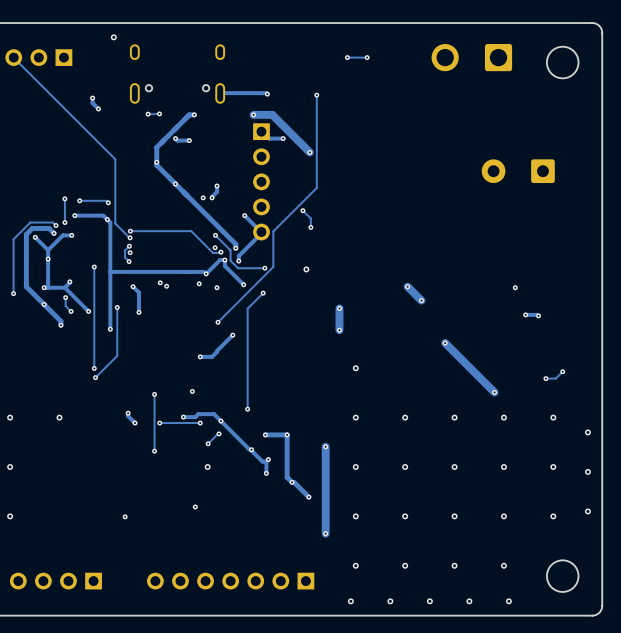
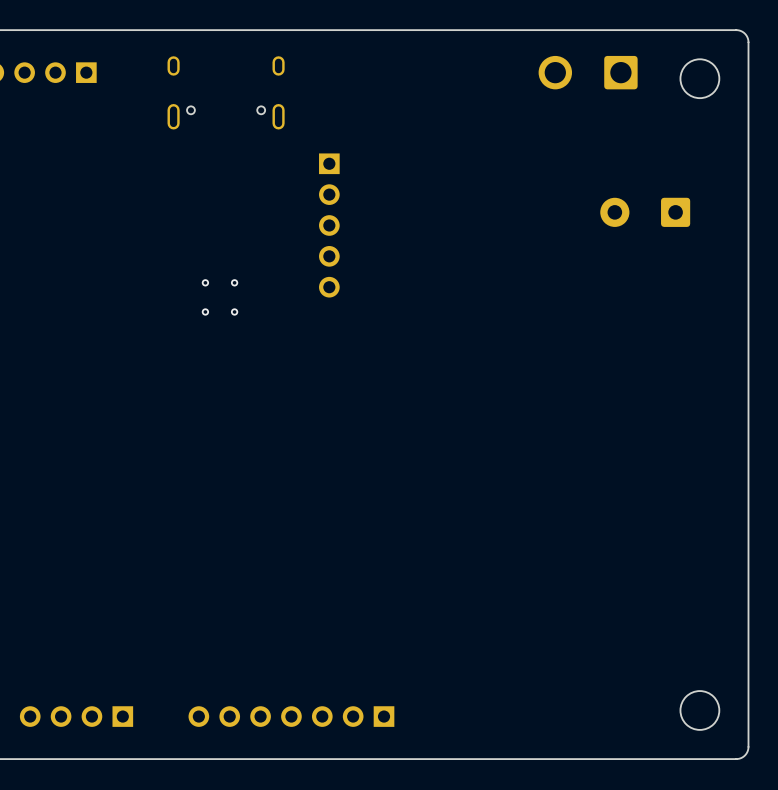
via: (113, 37) -> none
track: (13, 57) (115, 159) (115, 223) (130, 238) -> none
via: (347, 57) -> none
track: (367, 57) (347, 57) -> none
via: (367, 57) -> none
track: (220, 93) (267, 94) -> none
via: (267, 94) -> none
track: (316, 95) (316, 187) (273, 231) (273, 266) (218, 322) -> none
via: (316, 95) -> none
track: (92, 98) (92, 103) (98, 108) -> none
via: (92, 98) -> none
via: (98, 108) -> none
via: (159, 113) -> none
via: (148, 114) -> none
track: (159, 114) (148, 114) -> none
track: (194, 114) (189, 114) (156, 147) (156, 165) (235, 244) (235, 248) -> none
via: (194, 114) -> none
track: (253, 114) (272, 114) (309, 152) -> none
via: (253, 114) -> none
track: (261, 131) (269, 138) (283, 138) -> none
track: (175, 138) (177, 140) (189, 140) -> none
via: (175, 138) -> none
via: (283, 138) -> none
via: (189, 140) -> none
via: (309, 152) -> none
via: (156, 162) -> none
via: (175, 184) -> none
track: (217, 185) (217, 191) (212, 197) -> none
via: (217, 185) -> none
via: (203, 197) -> none
via: (212, 197) -> none
track: (64, 198) (64, 222) -> none
via: (64, 198) -> none
track: (79, 200) (106, 200) (108, 202) -> none
via: (79, 200) -> none
via: (108, 202) -> none
track: (302, 210) (310, 218) (310, 227) -> none
via: (302, 210) -> none
track: (74, 215) (103, 215) (110, 222) (110, 329) -> none
via: (74, 215) -> none
track: (244, 215) (261, 232) -> none
via: (244, 215) -> none
via: (107, 219) -> none
via: (64, 222) -> none
track: (56, 225) (53, 222) (30, 222) (13, 239) (13, 293) -> none
via: (56, 225) -> none
via: (310, 227) -> none
via: none -> (205, 282)
via: none -> (234, 282)
track: (130, 231) (191, 231) (213, 252) (220, 252) -> none
via: (130, 231) -> none
track: (261, 232) (238, 256) (238, 261) -> none
track: (54, 233) (49, 228) (32, 228) (26, 234) (26, 286) (60, 321) (60, 325) -> none
via: (54, 233) -> none
track: (71, 235) (62, 235) (48, 250) -> none
via: (71, 235) -> none
track: (215, 235) (230, 250) (230, 260) (238, 268) (264, 268) -> none
via: (215, 235) -> none
track: (35, 237) (48, 250) -> none
via: (35, 237) -> none
via: (130, 237) -> none
track: (129, 246) (124, 250) (124, 257) (129, 261) -> none
via: (129, 246) -> none
via: (215, 247) -> none
via: (235, 248) -> none
track: (48, 250) (48, 287) -> none
via: (130, 252) -> none
via: none -> (205, 311)
via: none -> (234, 311)
via: (220, 252) -> none
via: (48, 259) -> none
via: (224, 260) -> none
via: (129, 261) -> none
via: (238, 261) -> none
track: (94, 266) (94, 368) -> none
via: (94, 266) -> none
via: (264, 268) -> none
via: (306, 269) -> none
track: (110, 271) (204, 271) (206, 273) (219, 260) (224, 260) (224, 266) (243, 284) -> none
via: (206, 273) -> none
track: (69, 281) (64, 287) -> none
via: (69, 281) -> none
via: (160, 282) -> none
via: (199, 283) -> none
via: (243, 284) -> none
track: (133, 286) (138, 292) (138, 312) -> none
via: (133, 286) -> none
via: (166, 286) -> none
track: (407, 286) (421, 300) -> none
via: (407, 286) -> none
via: (44, 287) -> none
track: (64, 287) (44, 287) -> none
track: (64, 287) (88, 311) -> none
via: (217, 287) -> none
via: (515, 287) -> none
via: (13, 293) -> none
track: (263, 293) (247, 308) (247, 409) -> none
via: (263, 293) -> none
track: (65, 297) (65, 306) (71, 311) -> none
via: (65, 297) -> none
via: (421, 300) -> none
via: (44, 304) -> none
track: (117, 307) (117, 355) (95, 377) -> none
via: (117, 307) -> none
track: (339, 308) (339, 330) -> none
via: (339, 308) -> none
via: (71, 311) -> none
via: (88, 311) -> none
via: (138, 312) -> none
via: (525, 314) -> none
track: (537, 314) (525, 314) -> none
via: (538, 315) -> none
via: (218, 322) -> none
via: (60, 325) -> none
via: (110, 329) -> none
via: (339, 330) -> none
track: (232, 335) (212, 356) (200, 356) -> none
via: (232, 335) -> none
track: (445, 343) (494, 392) -> none
via: (445, 343) -> none
via: (200, 356) -> none
via: (94, 368) -> none
via: (355, 368) -> none
track: (562, 371) (555, 378) (545, 378) -> none
via: (562, 371) -> none
via: (95, 377) -> none
via: (545, 378) -> none
via: (192, 391) -> none
via: (494, 392) -> none
track: (154, 394) (154, 451) -> none
via: (154, 394) -> none
via: (247, 409) -> none
track: (128, 413) (128, 416) (135, 423) -> none
via: (128, 413) -> none
via: (10, 417) -> none
via: (59, 417) -> none
track: (183, 417) (195, 417) (198, 414) (214, 414) (262, 461) (266, 461) -> none
via: (183, 417) -> none
via: (355, 417) -> none
via: (405, 417) -> none
via: (454, 417) -> none
via: (503, 417) -> none
via: (553, 417) -> none
via: (220, 421) -> none
via: (135, 423) -> none
via: (159, 423) -> none
track: (200, 423) (159, 423) -> none
via: (200, 423) -> none
via: (587, 432) -> none
track: (218, 433) (208, 443) -> none
via: (219, 433) -> none
track: (265, 434) (287, 434) (287, 477) (292, 482) -> none
via: (265, 434) -> none
via: (287, 434) -> none
via: (208, 443) -> none
track: (325, 446) (325, 533) -> none
via: (325, 446) -> none
via: (251, 449) -> none
via: (154, 451) -> none
via: (268, 459) -> none
track: (266, 461) (266, 473) -> none
via: (10, 467) -> none
via: (207, 467) -> none
via: (355, 467) -> none
via: (405, 467) -> none
via: (454, 467) -> none
via: (503, 467) -> none
via: (553, 467) -> none
via: (587, 471) -> none
via: (266, 473) -> none
via: (292, 482) -> none
track: (294, 482) (308, 497) -> none
via: (308, 497) -> none
via: (195, 507) -> none
via: (587, 511) -> none
via: (10, 516) -> none
via: (125, 516) -> none
via: (355, 516) -> none
via: (405, 516) -> none
via: (454, 516) -> none
via: (503, 516) -> none
via: (553, 516) -> none
via: (325, 533) -> none
via: (355, 565) -> none
via: (405, 565) -> none
via: (454, 565) -> none
via: (503, 565) -> none
via: (350, 601) -> none
via: (390, 601) -> none
via: (429, 601) -> none
via: (469, 601) -> none
via: (508, 601) -> none

